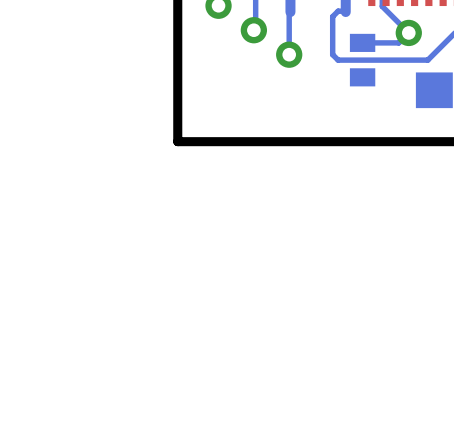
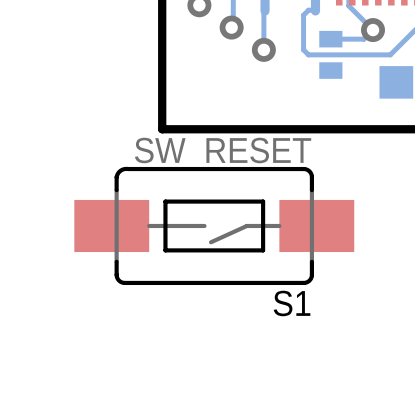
S1: none -> SW_RESET (214, 225)

